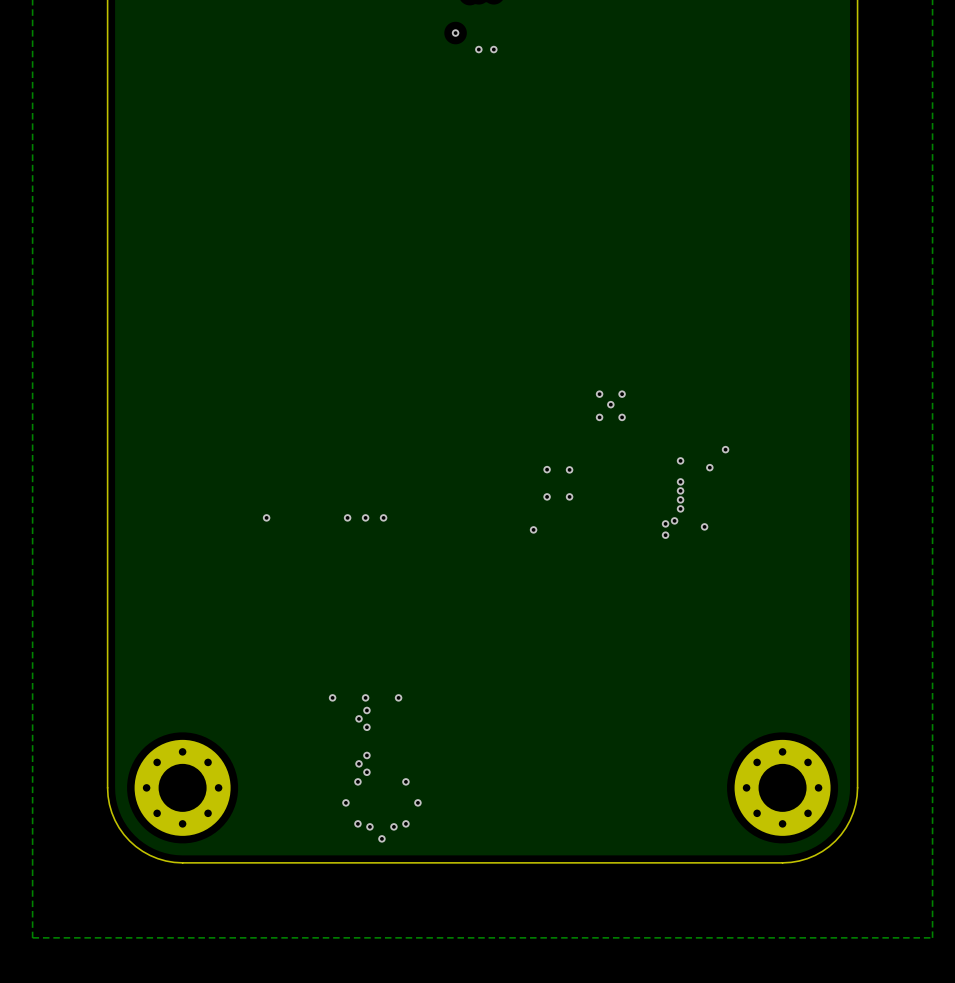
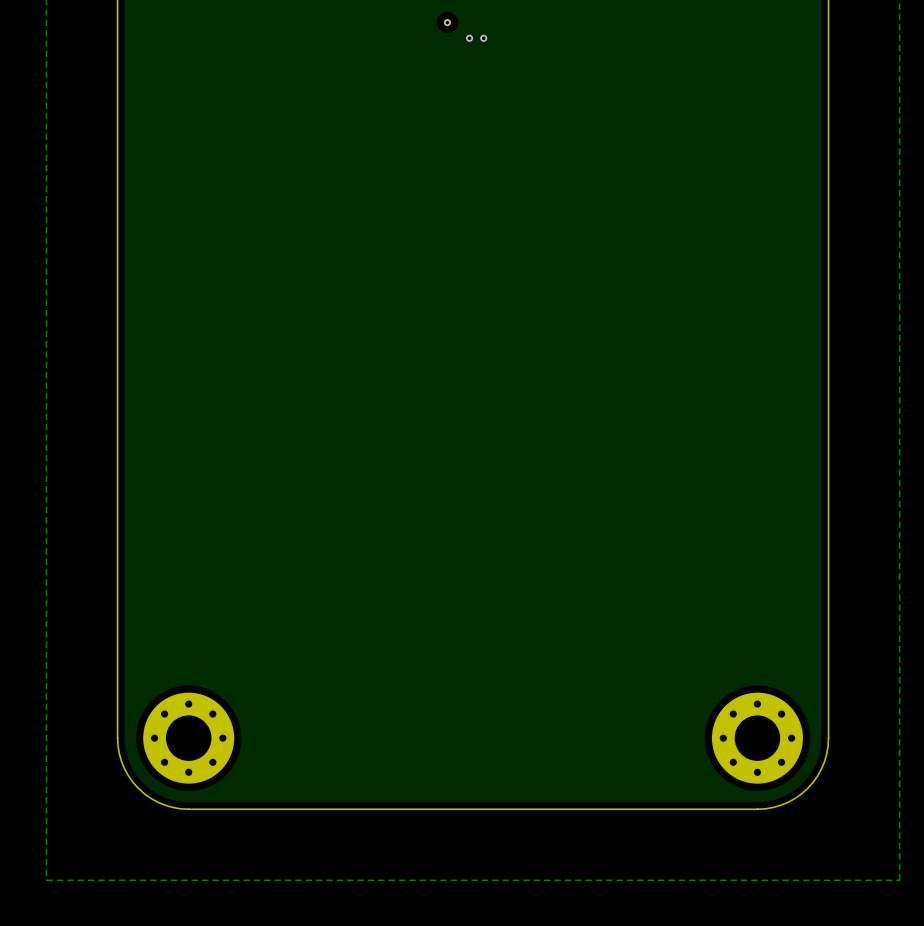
via: (599, 394) -> none
via: (622, 394) -> none
via: (610, 404) -> none
via: (599, 417) -> none
via: (622, 417) -> none
via: (725, 449) -> none
via: (680, 460) -> none
via: (709, 467) -> none
via: (547, 469) -> none
via: (569, 469) -> none
via: (680, 481) -> none
via: (680, 490) -> none
via: (547, 496) -> none
via: (569, 496) -> none
via: (680, 499) -> none
via: (680, 508) -> none
via: (266, 517) -> none
via: (347, 517) -> none
via: (365, 517) -> none
via: (383, 517) -> none
via: (674, 520) -> none
via: (665, 523) -> none
via: (704, 526) -> none
via: (533, 529) -> none
via: (665, 535) -> none
via: (332, 697) -> none
via: (365, 697) -> none
via: (398, 697) -> none
via: (366, 710) -> none
via: (358, 718) -> none
via: (366, 727) -> none
via: (366, 755) -> none
via: (358, 763) -> none
via: (366, 772) -> none
via: (357, 781) -> none
via: (405, 781) -> none
via: (345, 802) -> none
via: (417, 802) -> none
via: (357, 823) -> none
via: (405, 823) -> none
via: (369, 826) -> none
via: (393, 826) -> none
via: (381, 838) -> none

